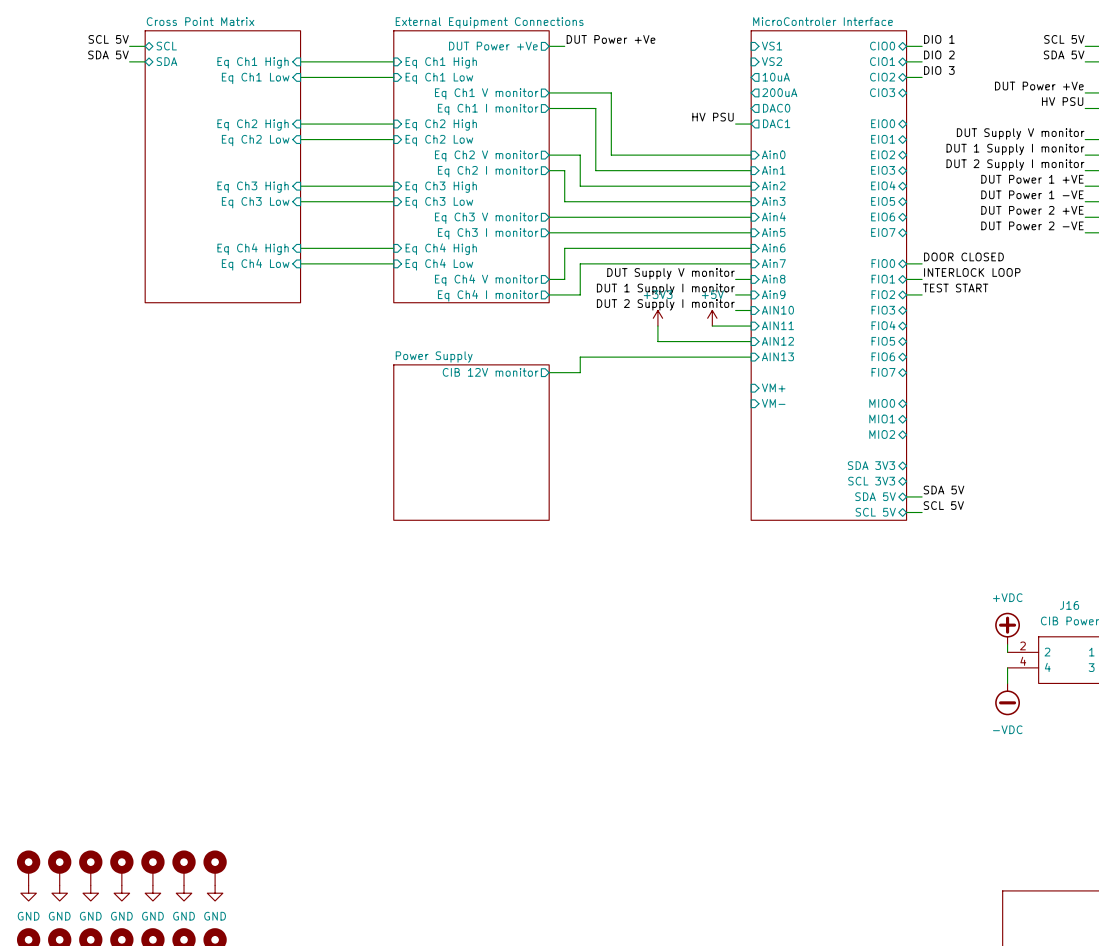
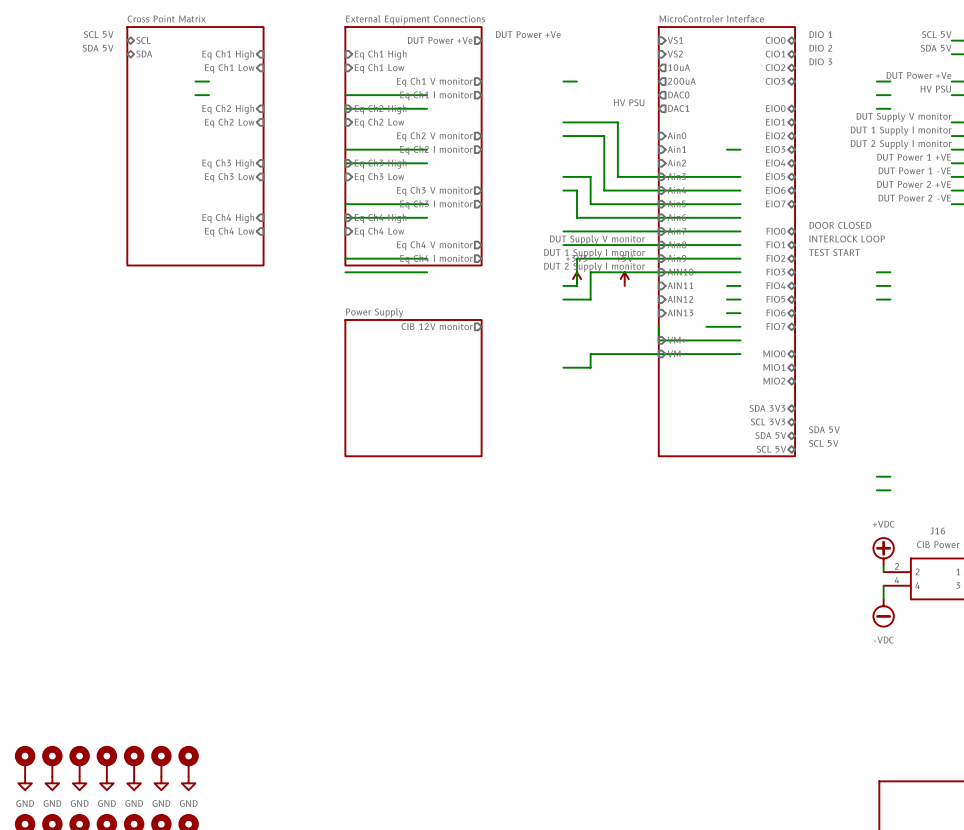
wire: (129, 46) (145, 46) -> (195, 81) (209, 81)
wire: (549, 46) (564, 46) -> (563, 81) (577, 81)
wire: (906, 46) (922, 46) -> (876, 81) (890, 81)
wire: (129, 61) (145, 61) -> (195, 95) (209, 95)
wire: (300, 61) (393, 61) -> (345, 95) (427, 95)
wire: (906, 61) (922, 61) -> (876, 95) (890, 95)
wire: (300, 77) (393, 77) -> none
wire: (906, 77) (922, 77) -> (876, 108) (890, 108)
wire: (549, 92) (611, 92) (611, 155) (642, 155) -> none
wire: (549, 108) (595, 108) (595, 170) (751, 170) -> none
wire: (300, 124) (393, 124) -> (427, 108) (345, 108)
wire: (735, 124) (751, 124) -> (726, 149) (740, 149)
wire: (300, 139) (393, 139) -> (345, 149) (427, 149)
wire: none -> (563, 122) (617, 122) (617, 176)
wire: (549, 155) (580, 155) (580, 186) (751, 186) -> none
wire: (689, 155) (751, 155) -> (604, 136) (604, 190)
wire: (549, 170) (564, 170) (564, 201) (642, 201) -> none
wire: (300, 186) (393, 186) -> (427, 163) (345, 163)
wire: (300, 201) (393, 201) -> (345, 204) (427, 204)
wire: (673, 201) (704, 201) -> (590, 176) (590, 204)
wire: none -> (658, 176) (740, 176)
wire: (549, 217) (642, 217) -> (563, 245) (645, 245)
wire: (657, 217) (689, 217) -> (577, 190) (577, 217)
wire: none -> (658, 190) (740, 190)
wire: (549, 232) (673, 232) -> none
wire: none -> (658, 204) (740, 204)
wire: (300, 248) (393, 248) -> (427, 217) (345, 217)
wire: (657, 248) (564, 248) (564, 279) (549, 279) -> none
wire: none -> (658, 217) (740, 217)
wire: (300, 263) (393, 263) -> (345, 272) (427, 272)
wire: (642, 263) (580, 263) (580, 294) (549, 294) -> none
wire: none -> (658, 231) (740, 231)
wire: (906, 263) (922, 263) -> (876, 272) (890, 272)
wire: none -> (658, 245) (740, 245)
wire: (906, 279) (922, 279) -> (876, 285) (890, 285)
wire: none -> (345, 258) (427, 258)
wire: none -> (645, 258) (577, 258) (577, 285) (563, 285)
wire: none -> (658, 258) (740, 258)
wire: (906, 294) (922, 294) -> (876, 299) (890, 299)
wire: none -> (658, 272) (740, 272)
wire: (657, 326) (657, 341) -> (563, 299) (577, 299)
wire: (712, 326) (751, 326) -> (706, 326) (740, 326)
wire: none -> (726, 285) (740, 285)
wire: (673, 341) (751, 341) -> (590, 299) (590, 272) (645, 272)
wire: none -> (726, 299) (740, 299)
wire: (751, 357) (580, 357) (580, 372) (549, 372) -> (740, 354) (590, 354) (590, 367) (563, 367)
wire: none -> (726, 313) (740, 313)
wire: none -> (658, 326) (658, 340) (740, 340)
wire: (906, 496) (922, 496) -> (876, 476) (890, 476)
wire: (906, 512) (922, 512) -> (876, 490) (890, 490)

